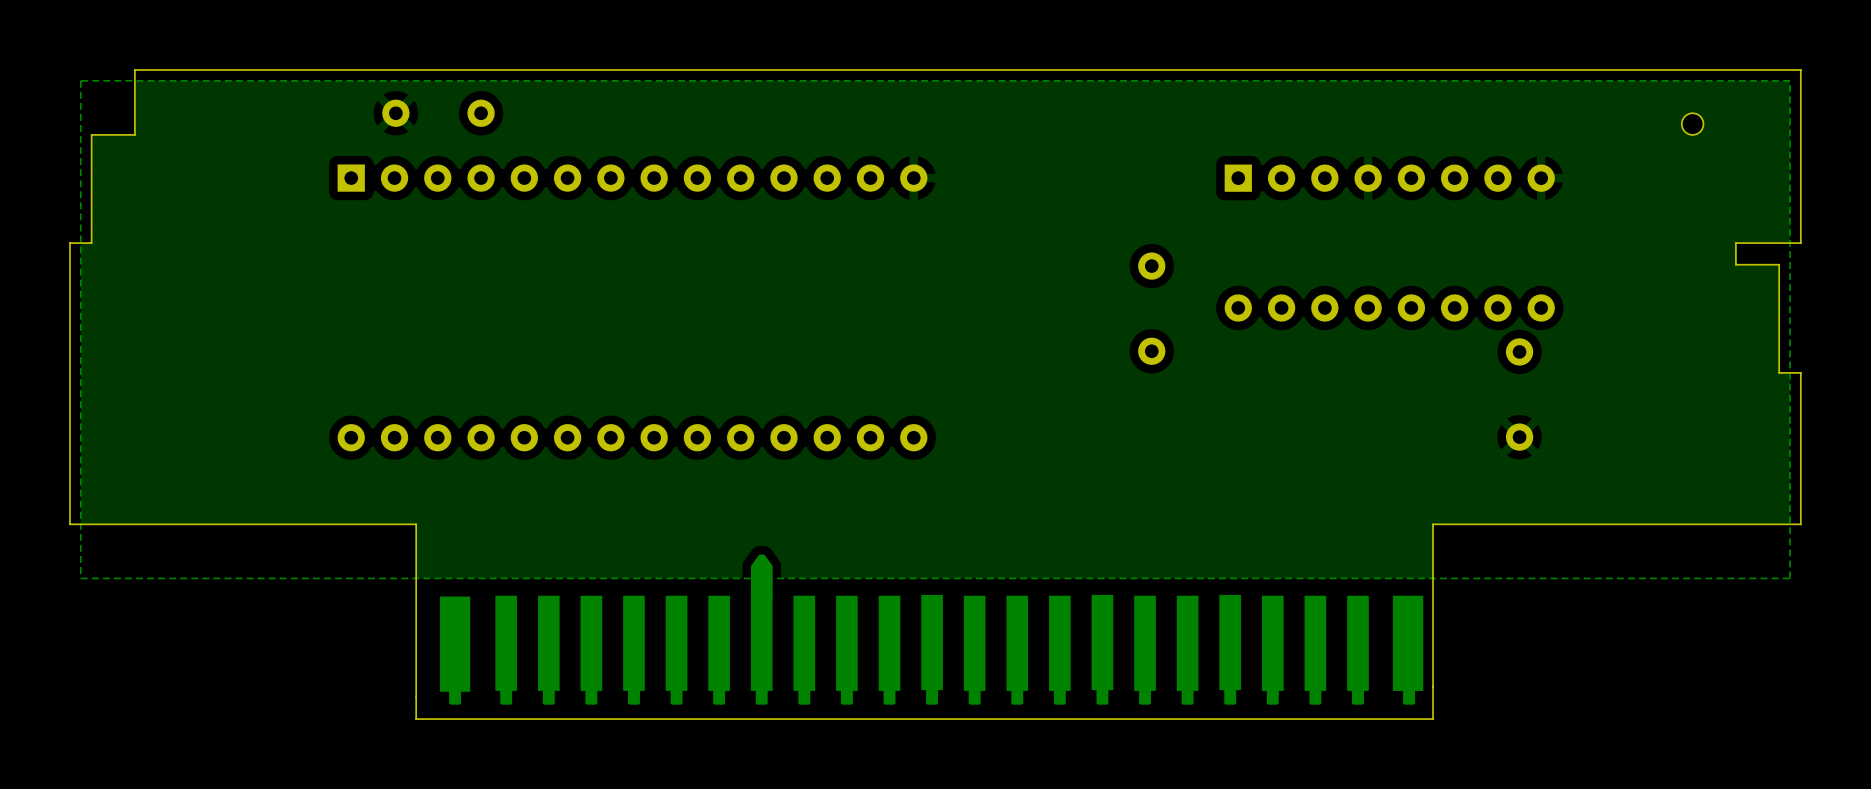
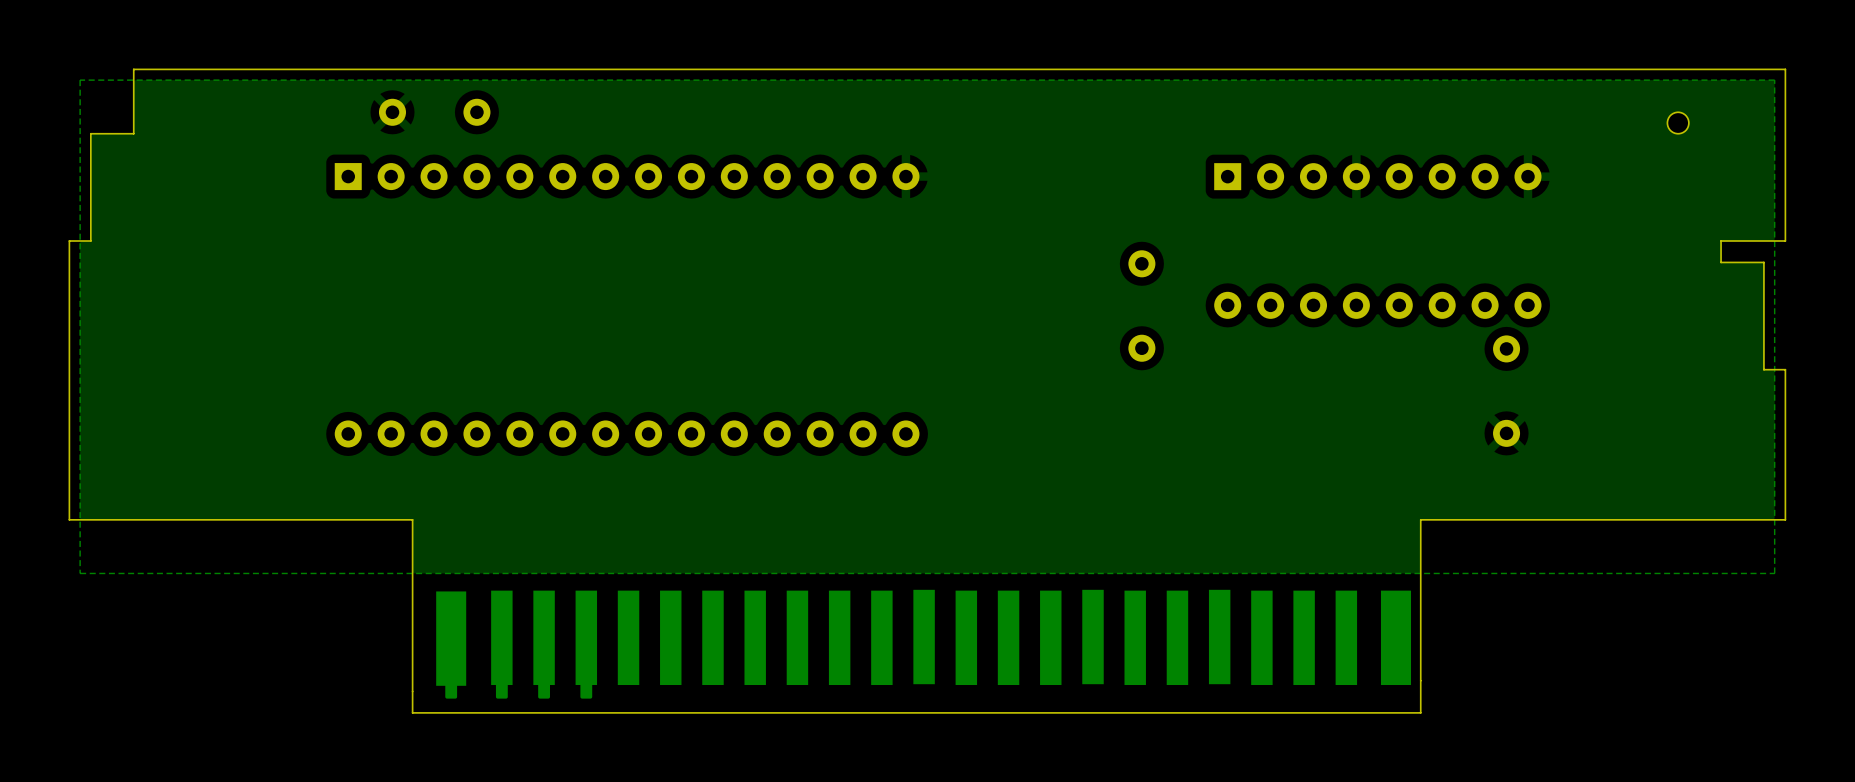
part: (931, 629) -> none
part: none -> (923, 644)

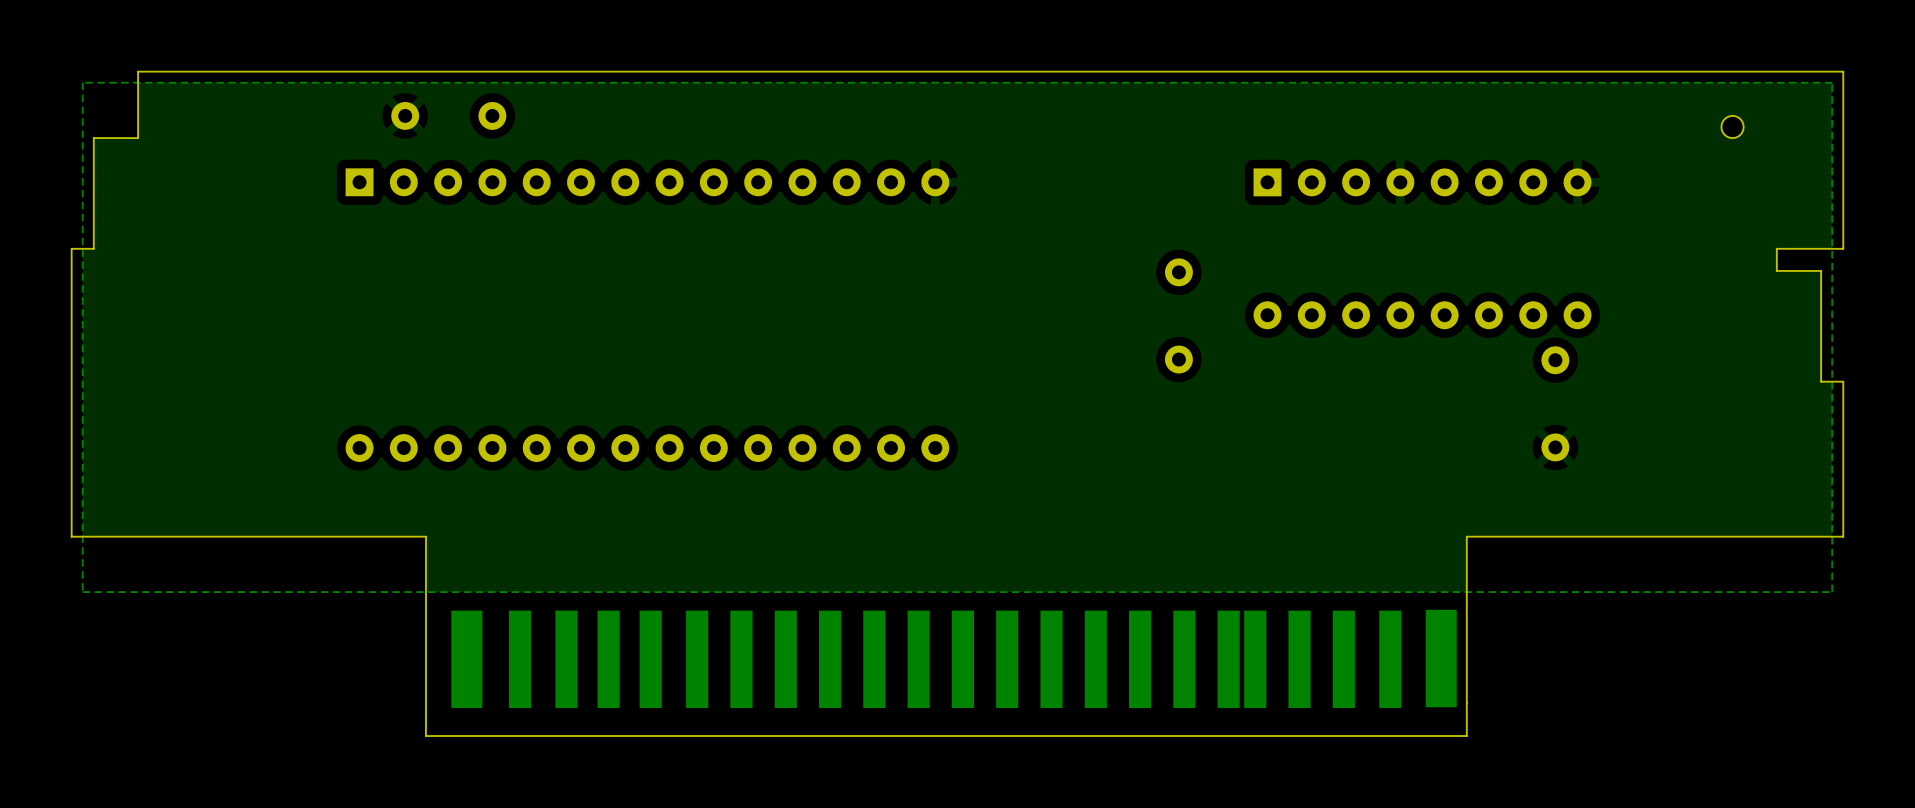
part footprint: [436, 589, 1412, 699] -> [451, 609, 1457, 709]

